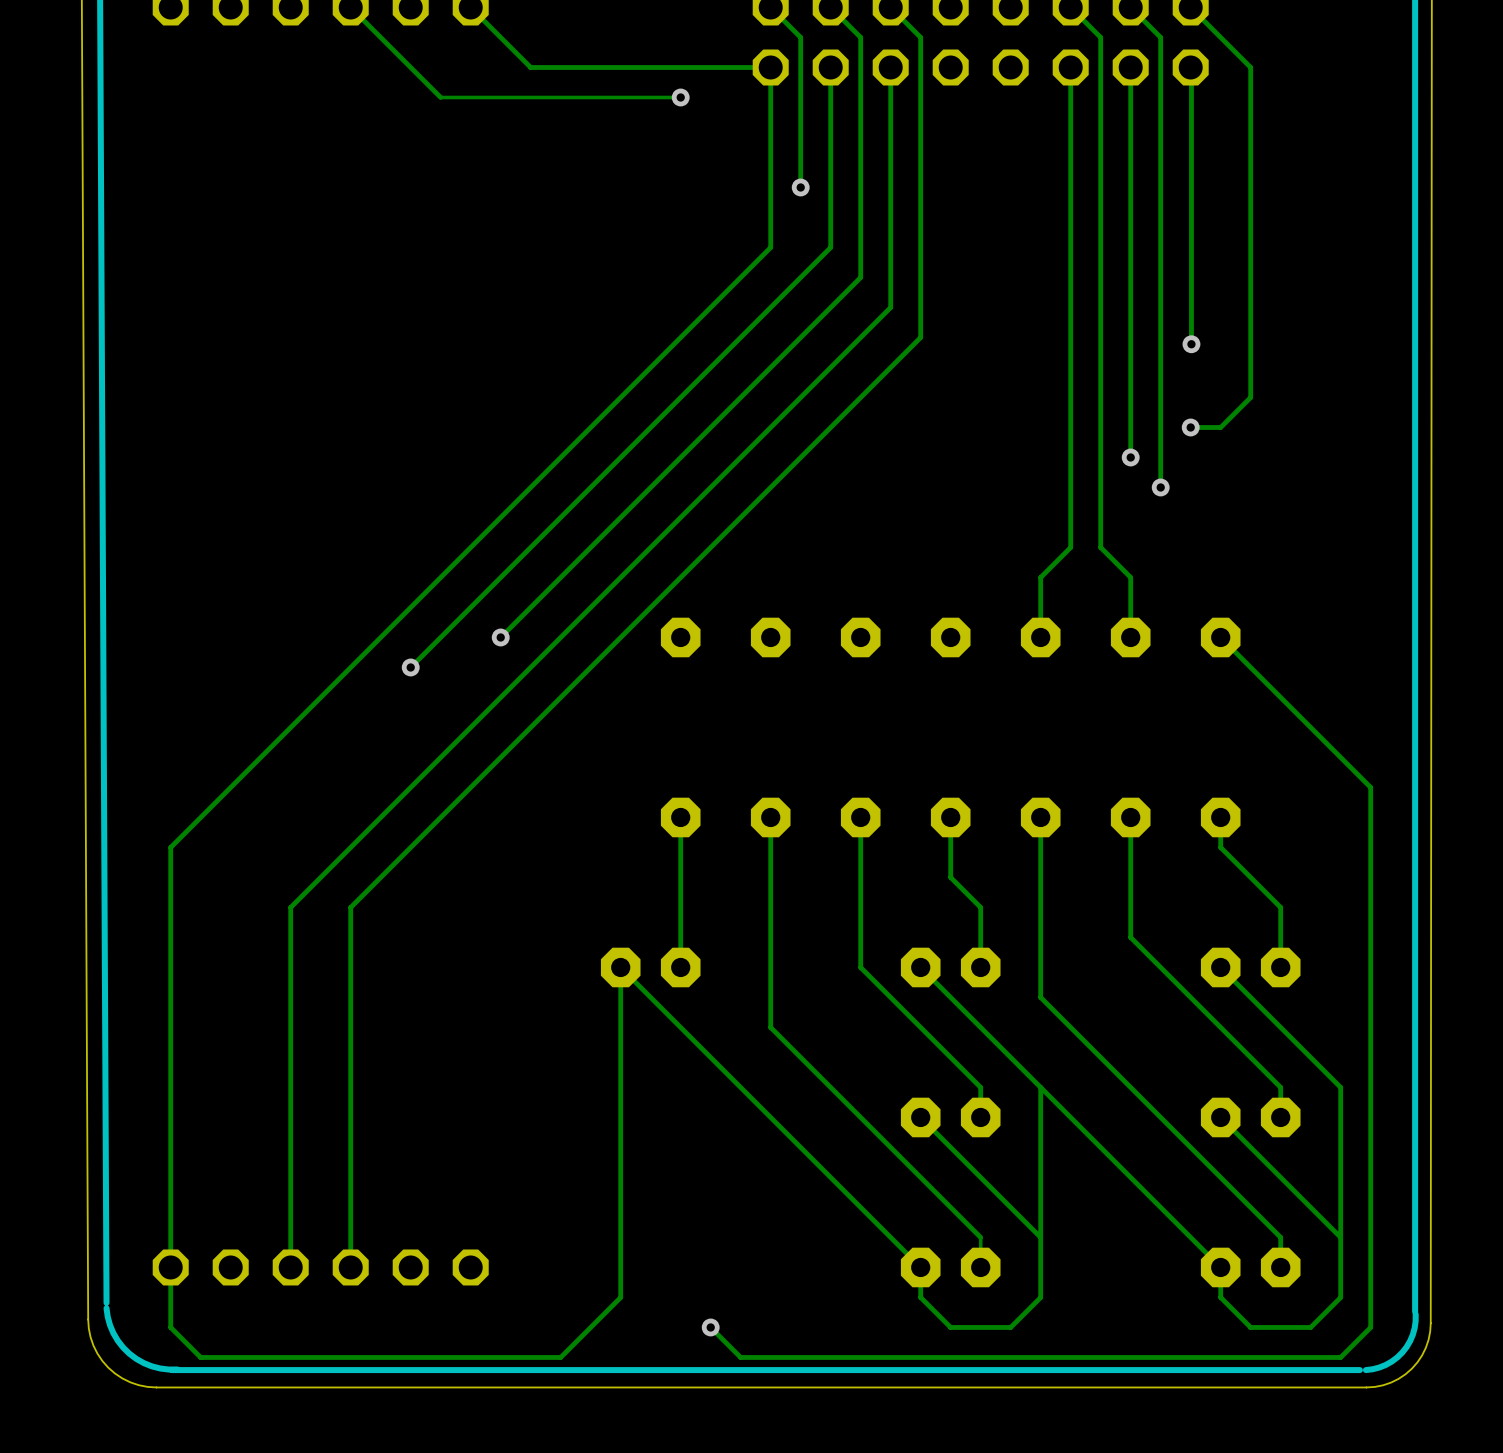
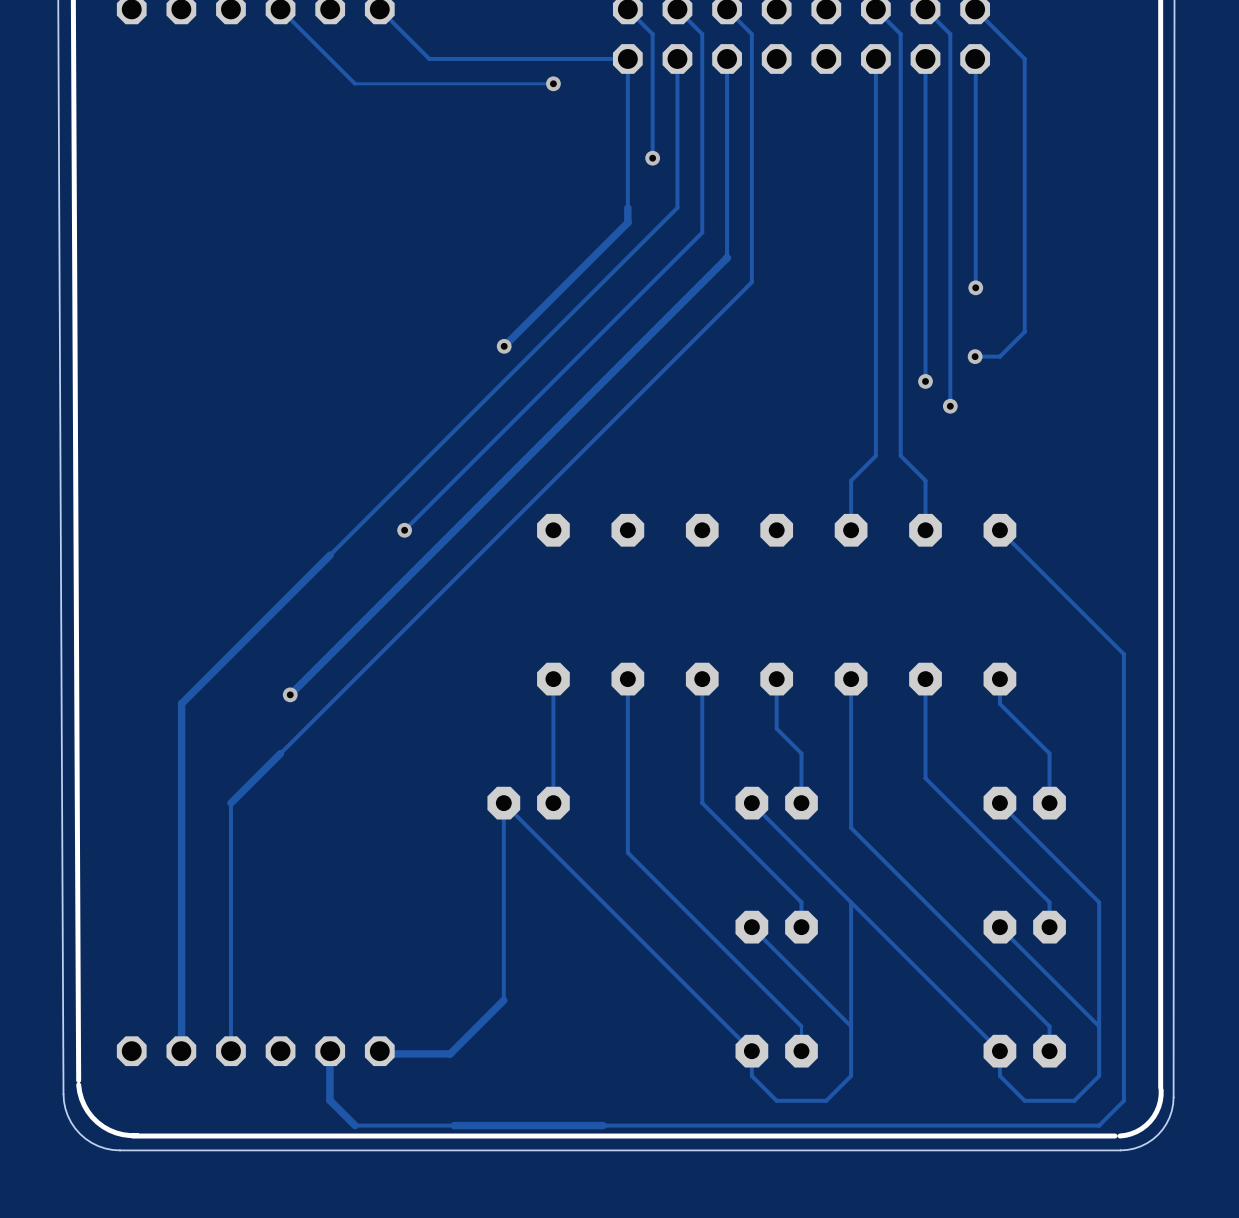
track: (770, 247) (170, 847) (170, 1327) (200, 1357) (440, 1357) -> (627, 207) (627, 222) (504, 346)
track: (890, 307) (290, 907) (290, 967) -> (727, 257) (290, 694)
via: none -> (504, 346)
track: none -> (330, 555) (181, 703) (181, 1049)
via: (410, 667) -> none
via: none -> (290, 694)
track: (350, 907) (350, 1267) -> (280, 753) (230, 803)
track: (620, 1205) (620, 1297) (560, 1357) -> (503, 1000) (450, 1053) (382, 1053) (379, 1051)
track: none -> (329, 1051) (329, 1100) (355, 1125)
track: (710, 1327) (740, 1357) -> (454, 1125) (603, 1125)
via: (710, 1327) -> none

